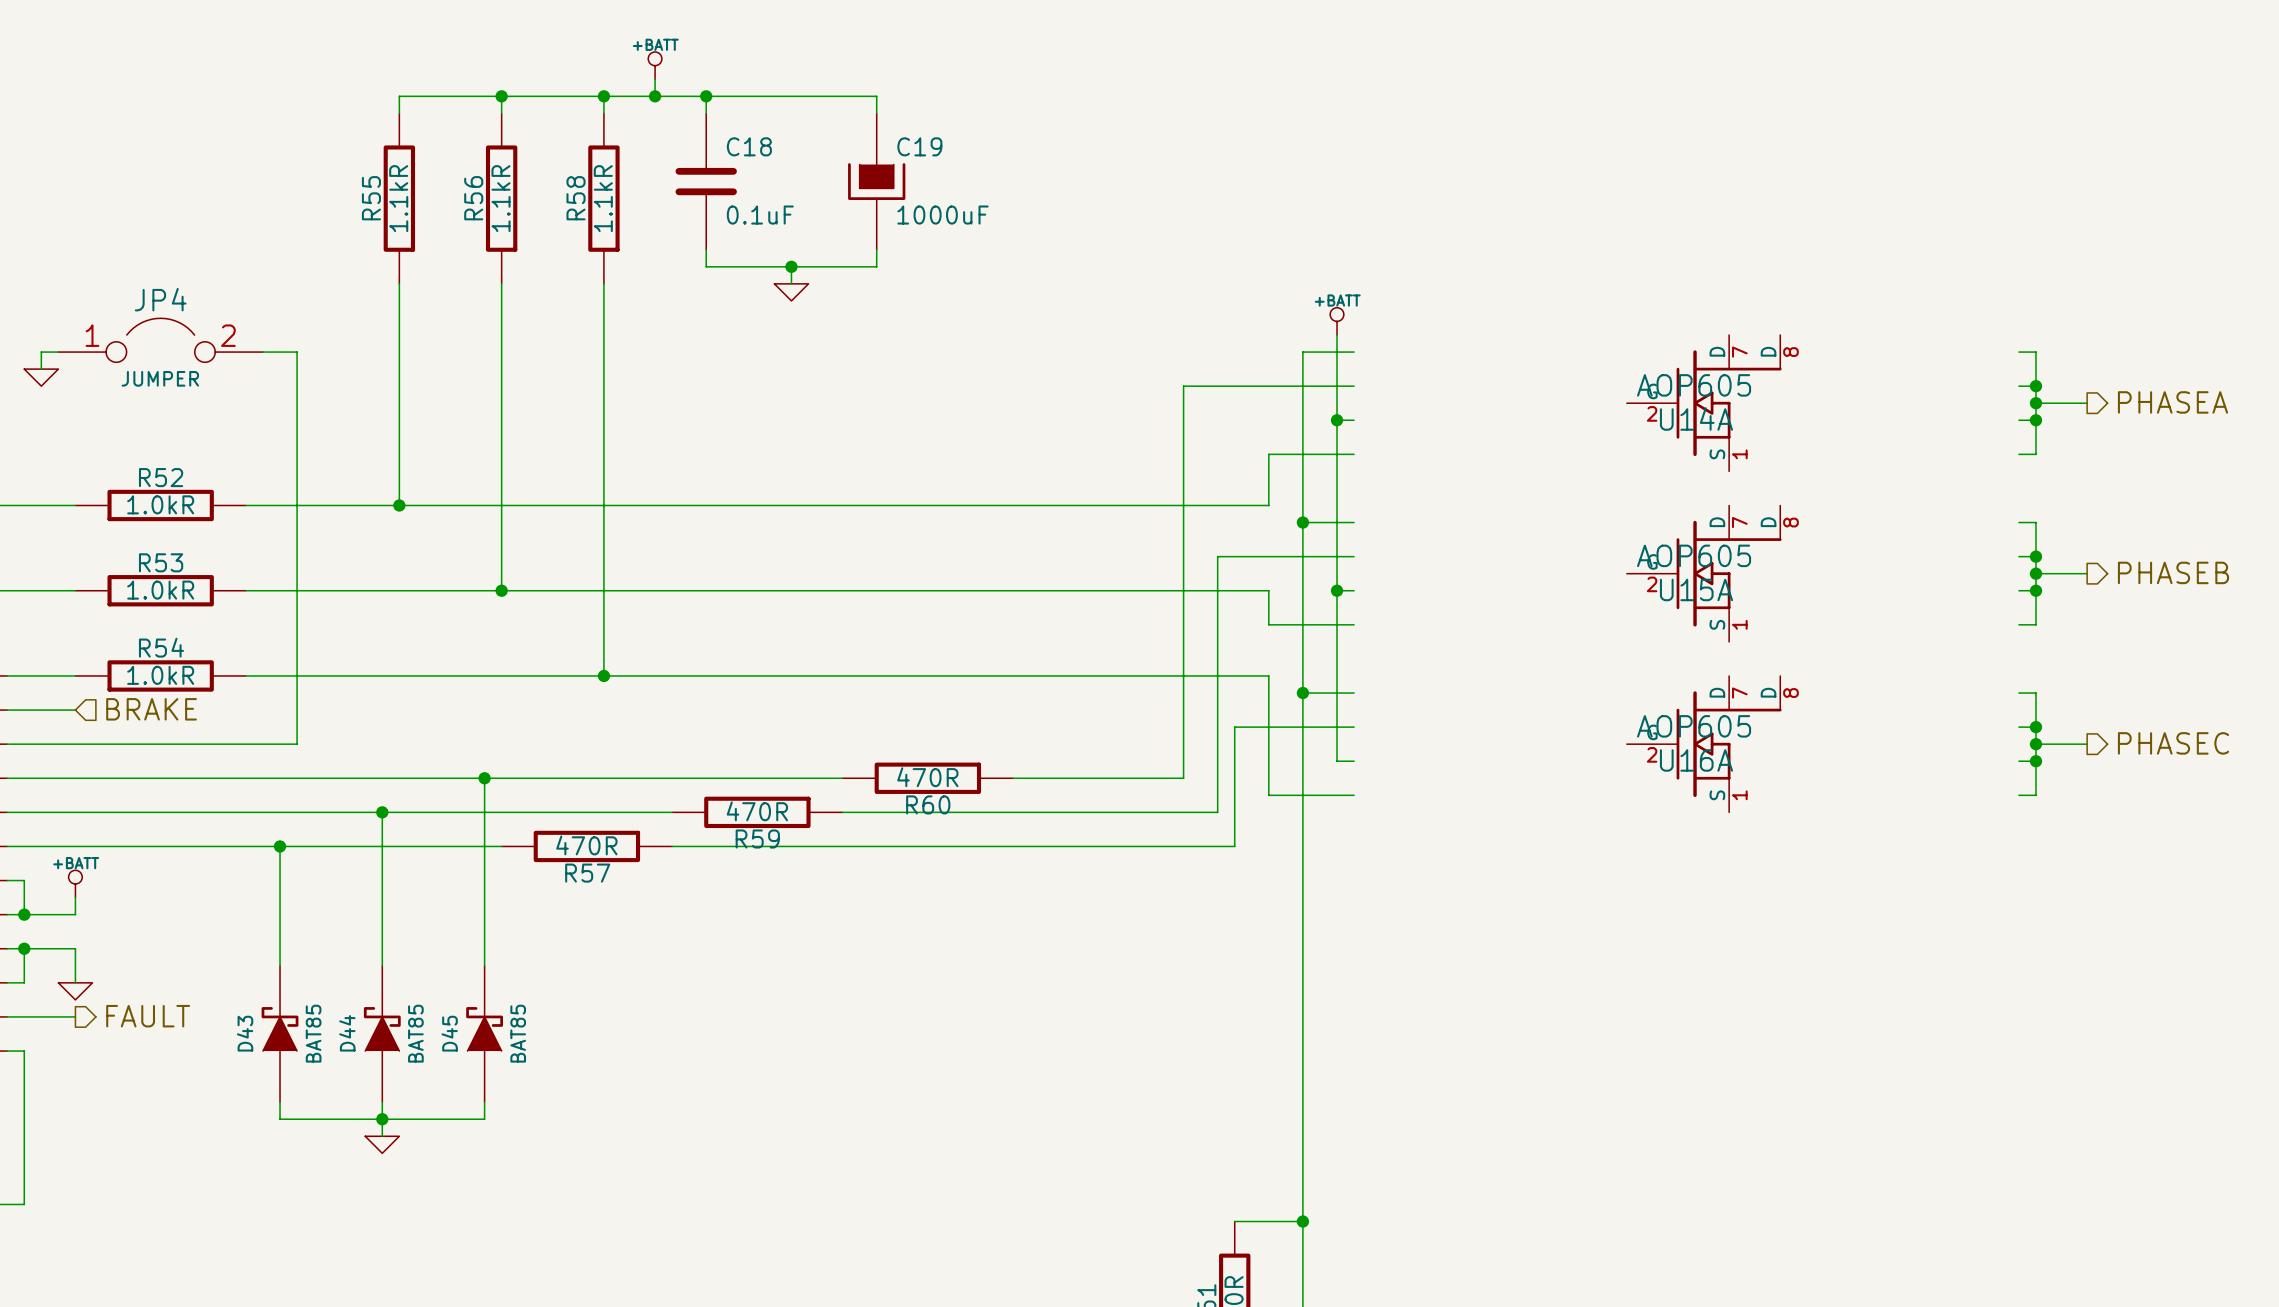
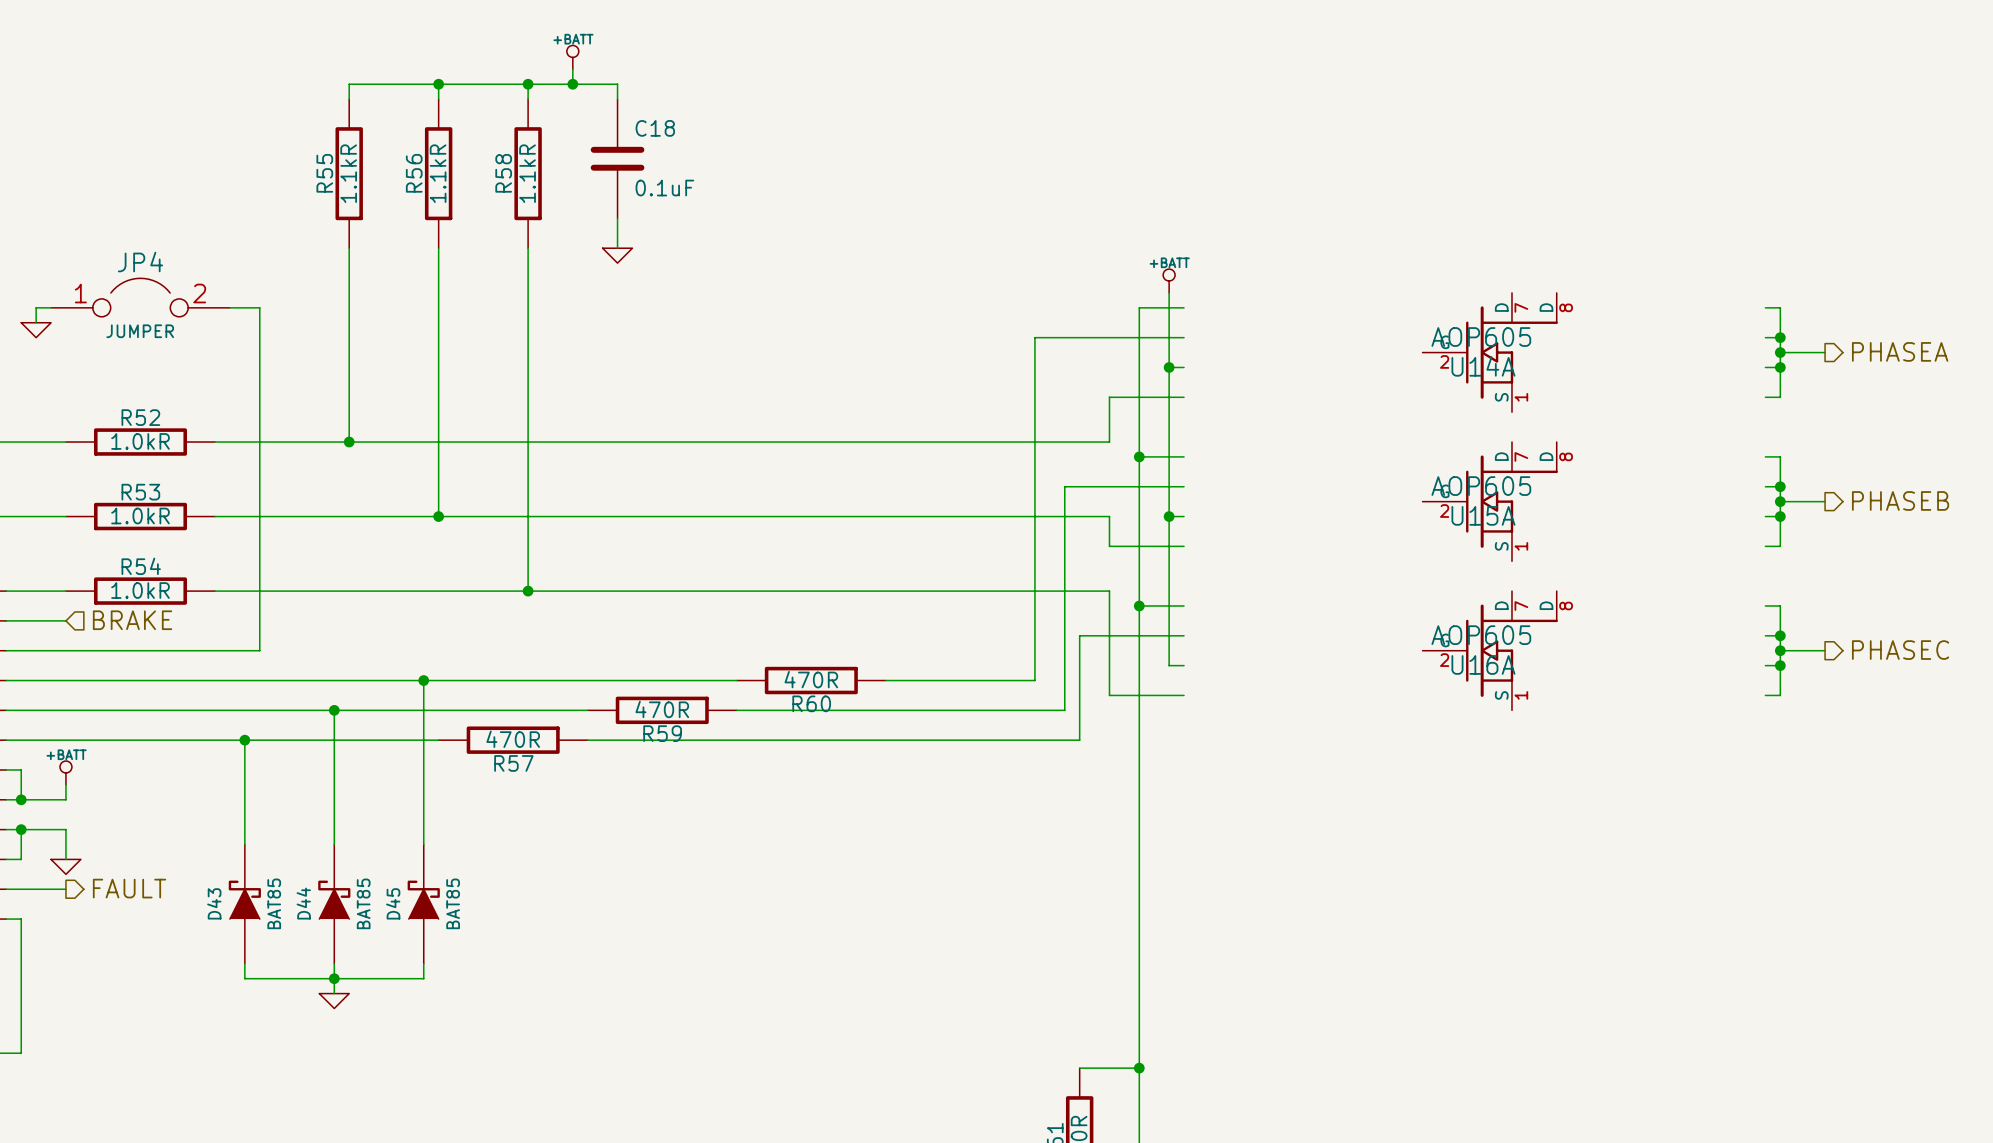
wire: (706, 96) (876, 96) (876, 113) -> none
junction: (706, 96) -> none
C19: 1000uF (876, 181) -> none
wire: (876, 249) (876, 266) (706, 266) -> (617, 248) (617, 233)
wire: (791, 266) (791, 283) -> none
junction: (791, 266) -> none
power symbol position: (791, 292) -> (617, 255)

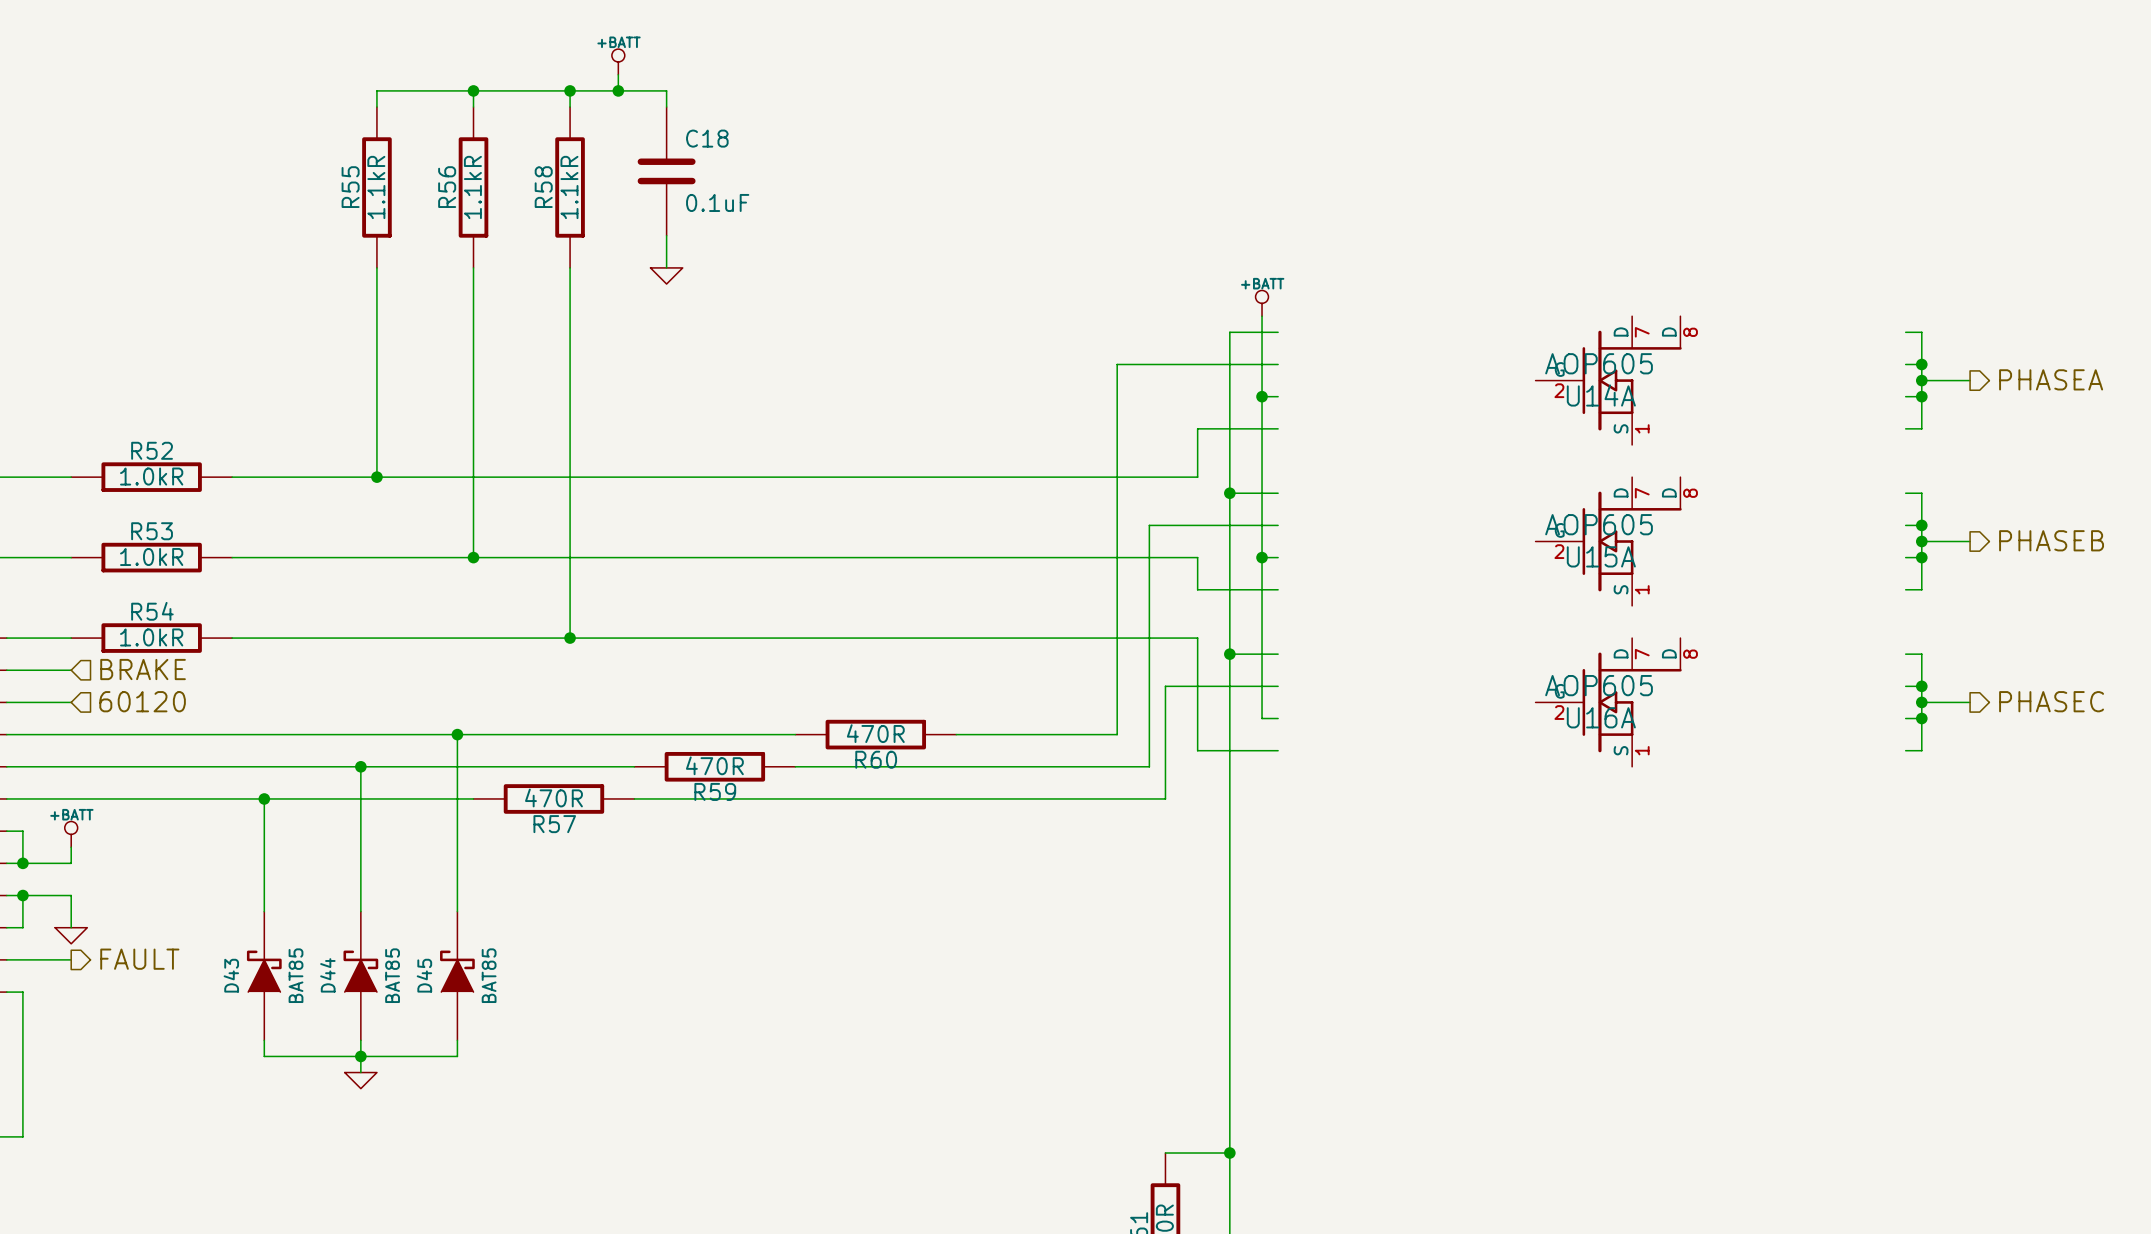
JP4: JUMPER (140, 297) -> none
wire: (51, 307) (36, 307) (36, 322) -> none
wire: (229, 307) (259, 307) (259, 650) (65, 650) -> none
power symbol: (36, 330) -> none
hierarchical label: none -> 60120 (142, 701)

